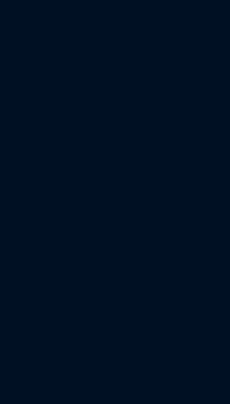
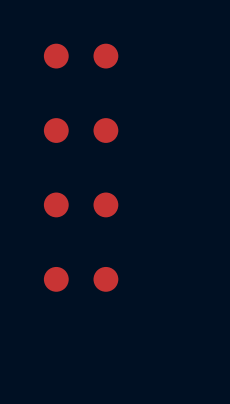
part: none -> (81, 56)
part: none -> (81, 130)
part: none -> (81, 204)
part: none -> (81, 279)

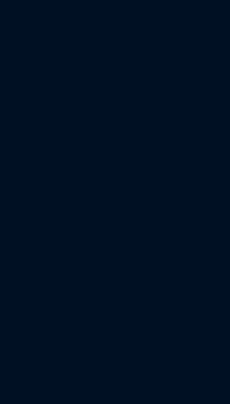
part: (81, 56) -> none
part: (81, 130) -> none
part: (81, 204) -> none
part: (81, 279) -> none

